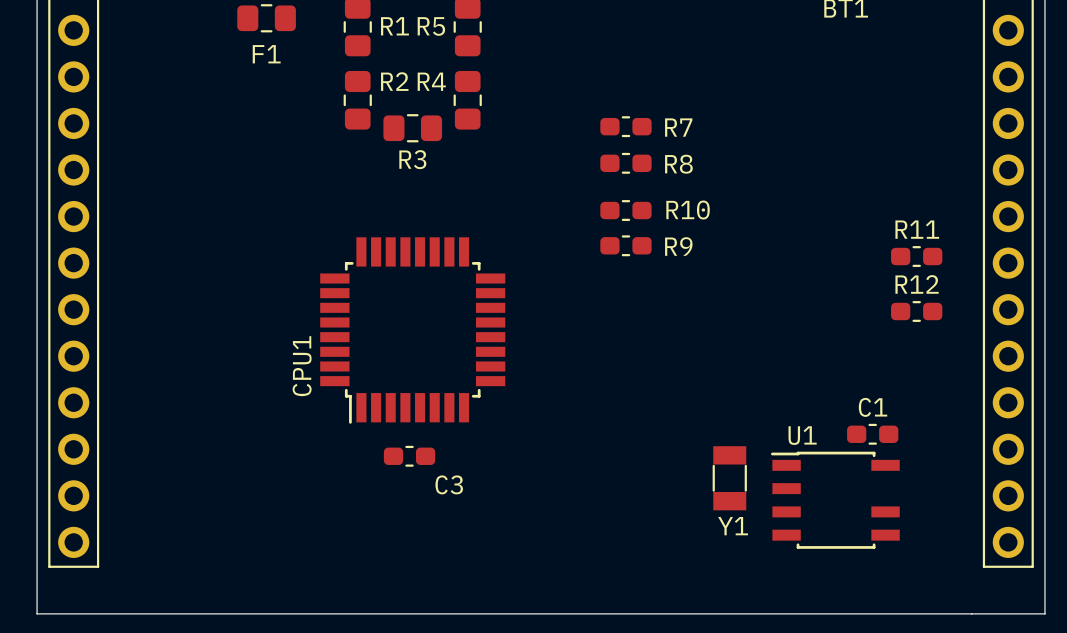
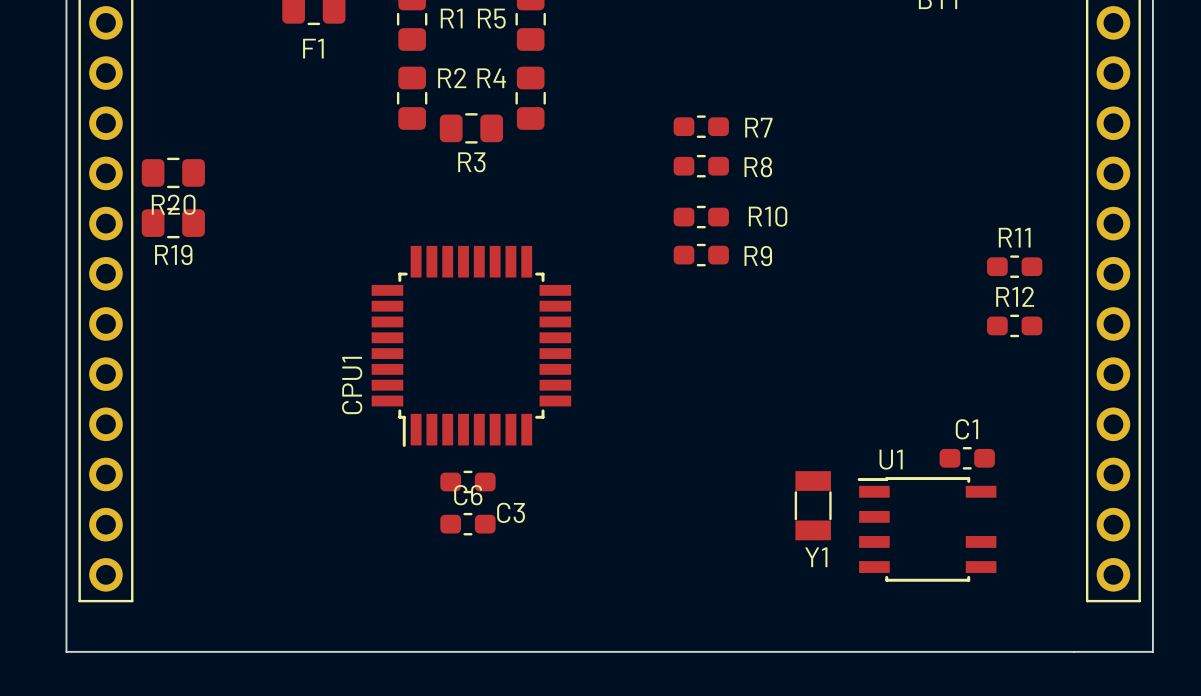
R20: none -> (173, 172)
R19: none -> (173, 223)
C6: none -> (467, 524)

